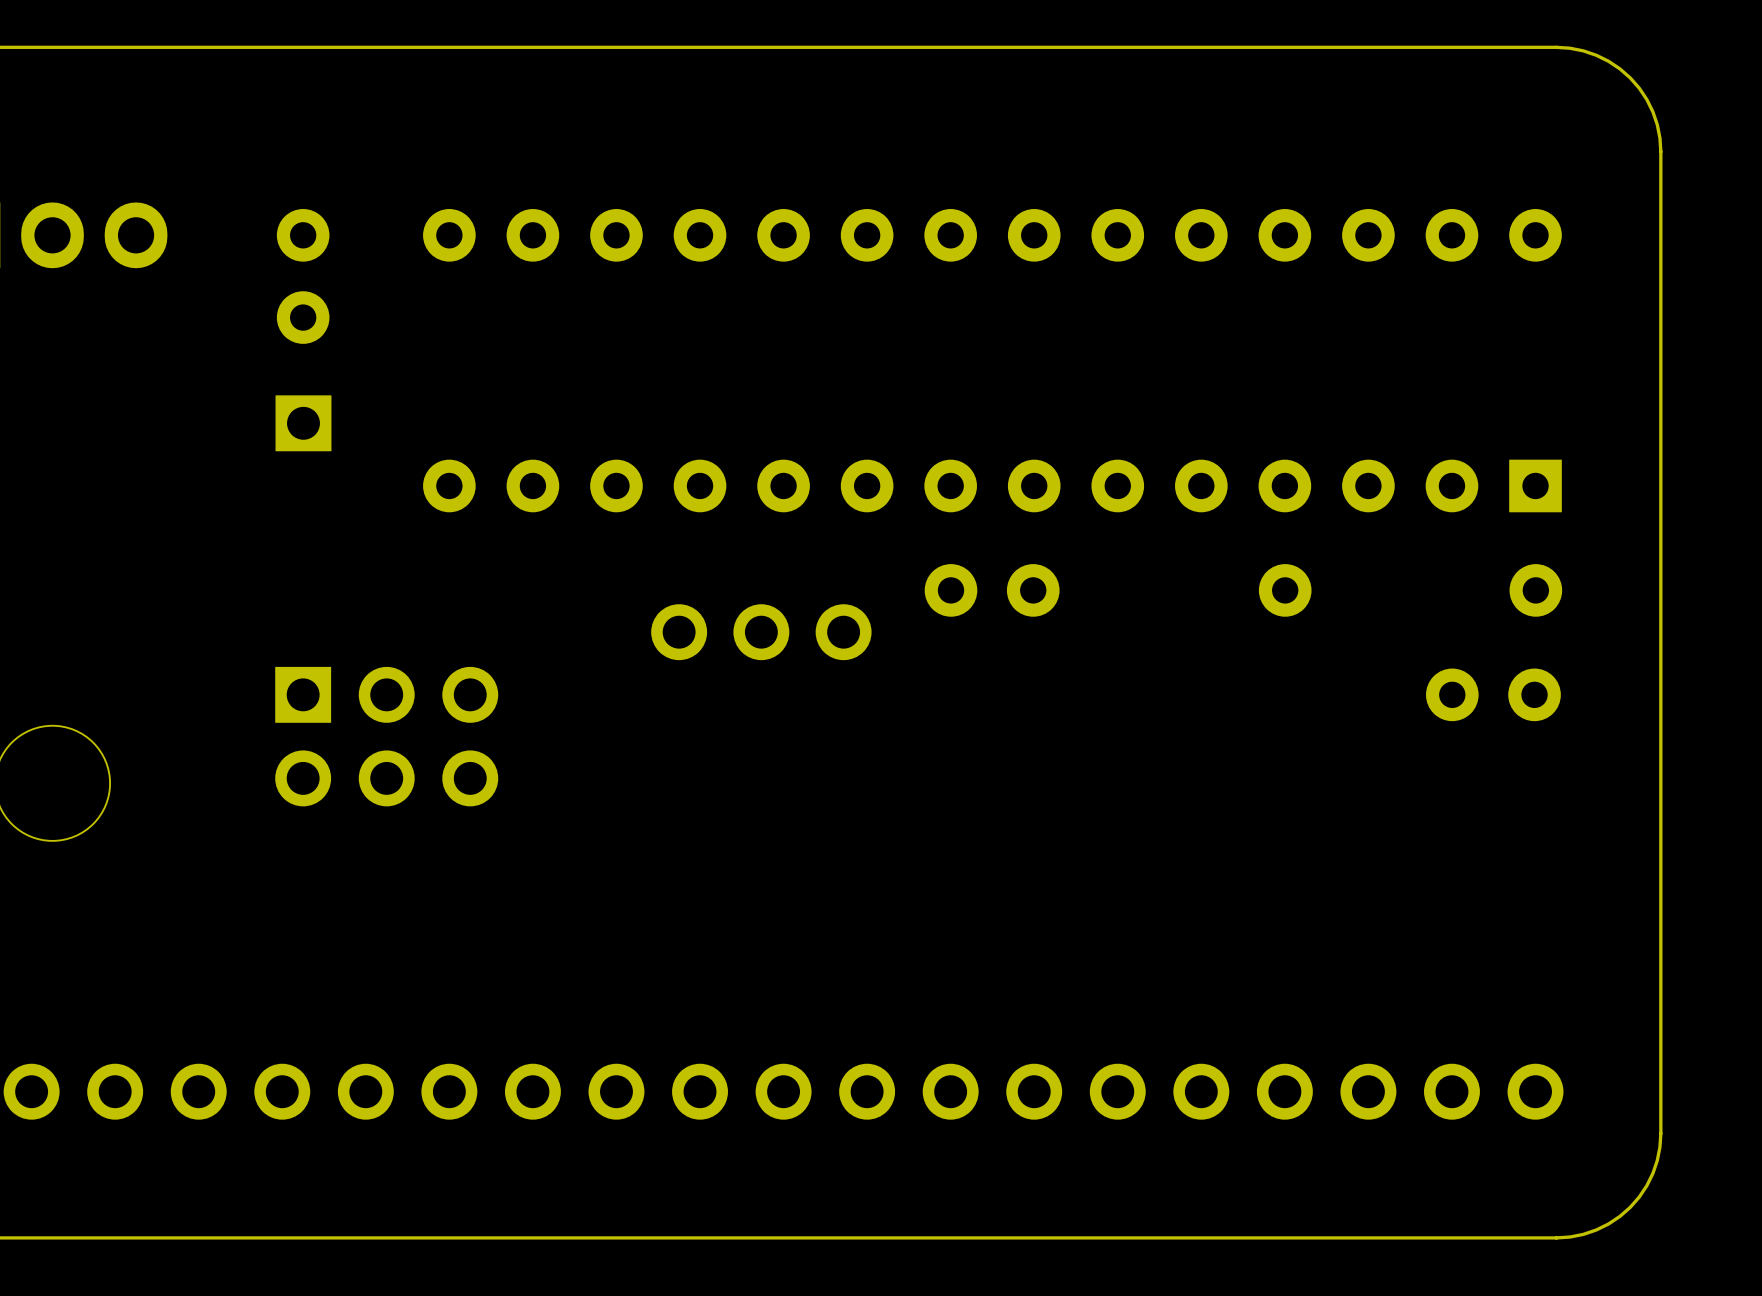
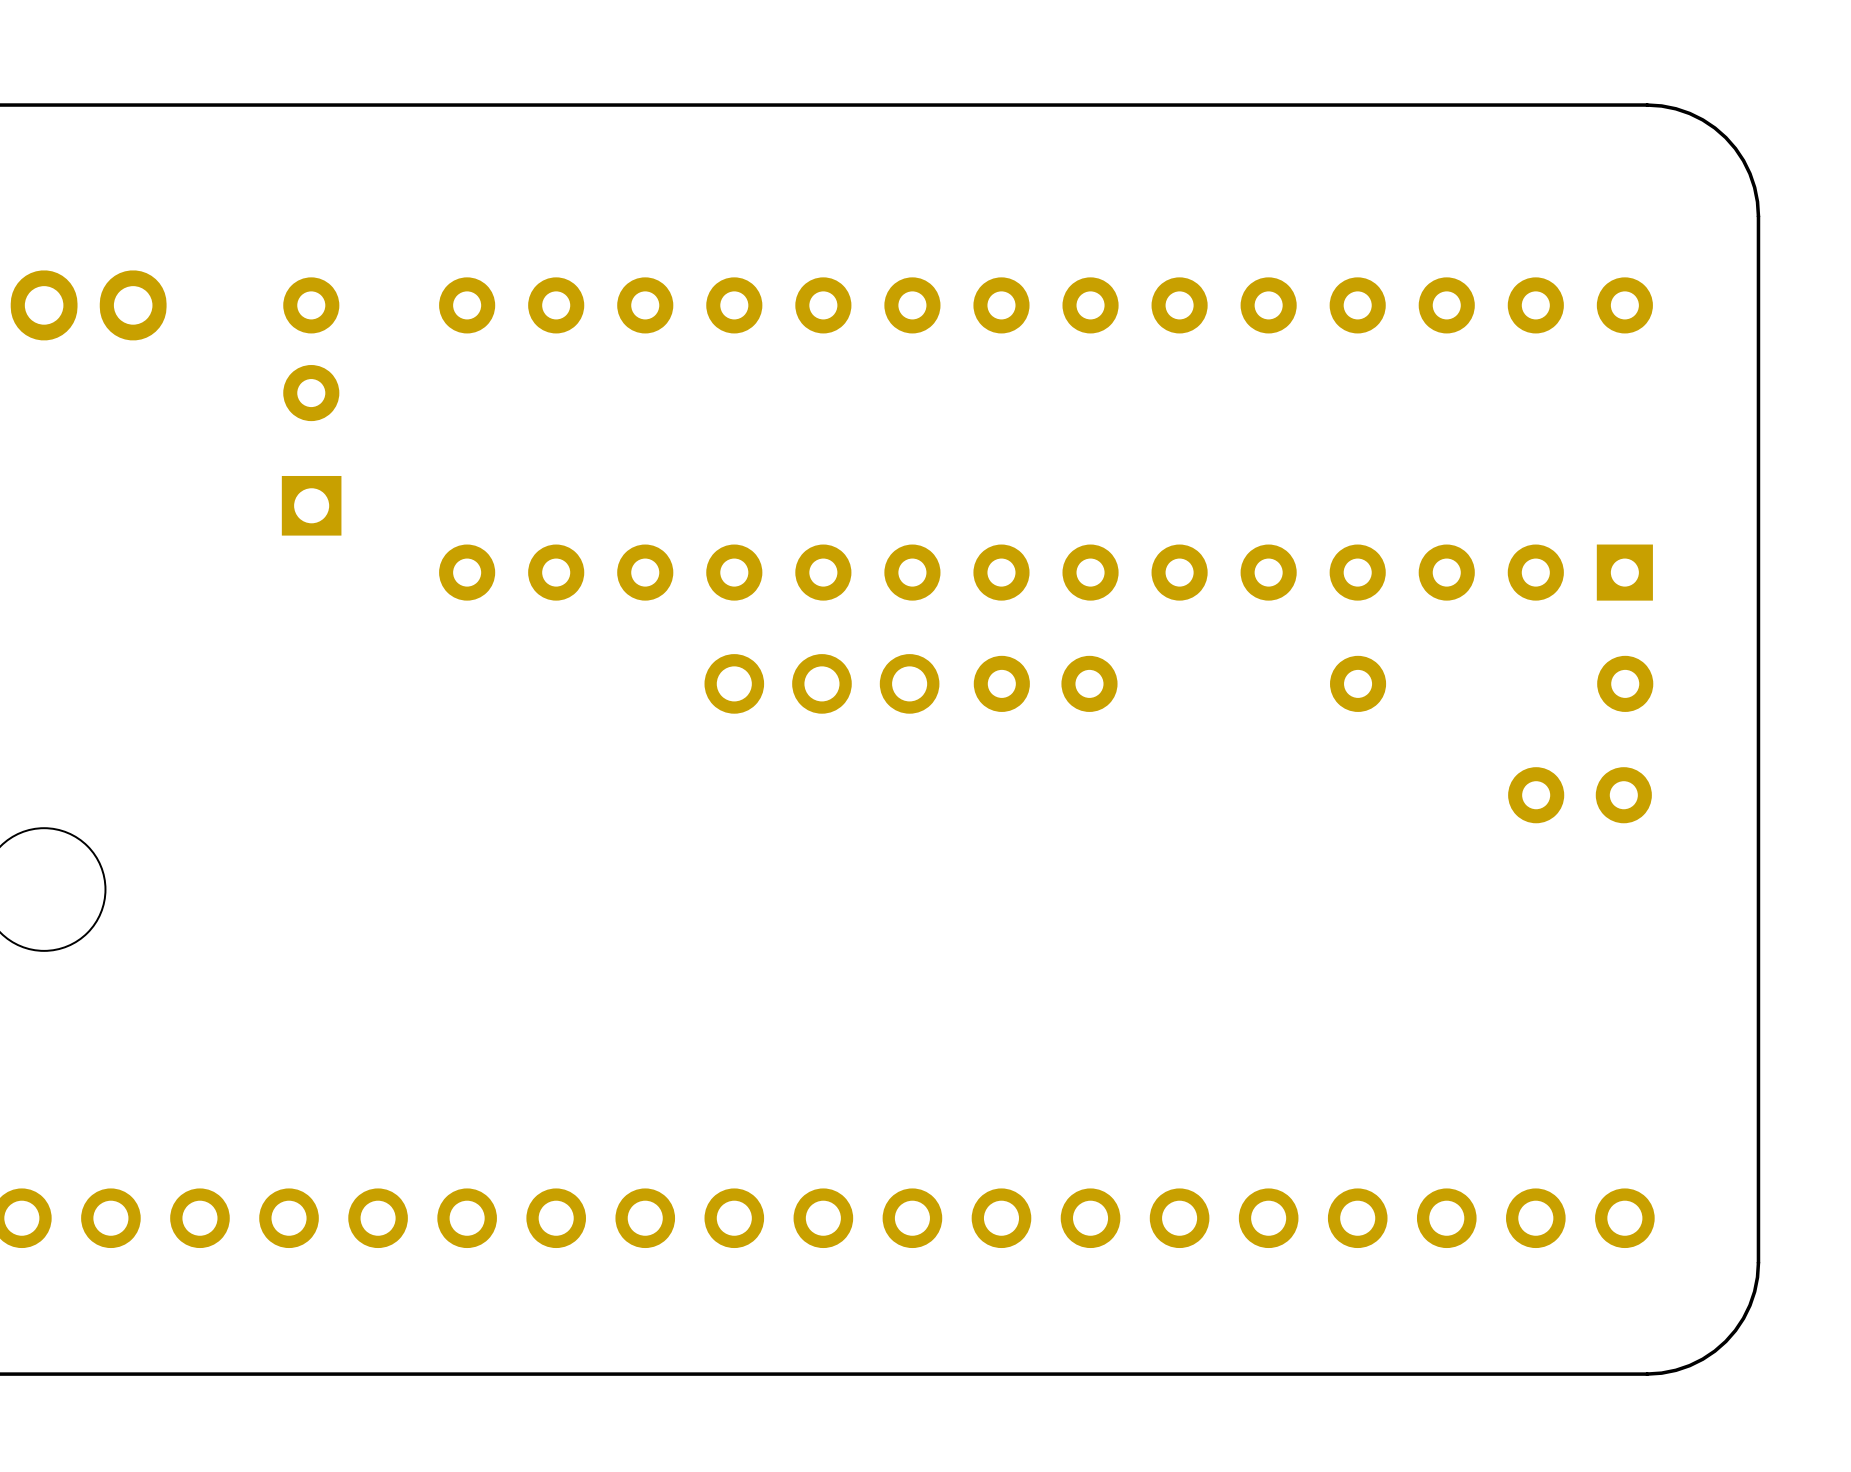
part position: (761, 632) -> (821, 683)
part: (386, 736) -> none

